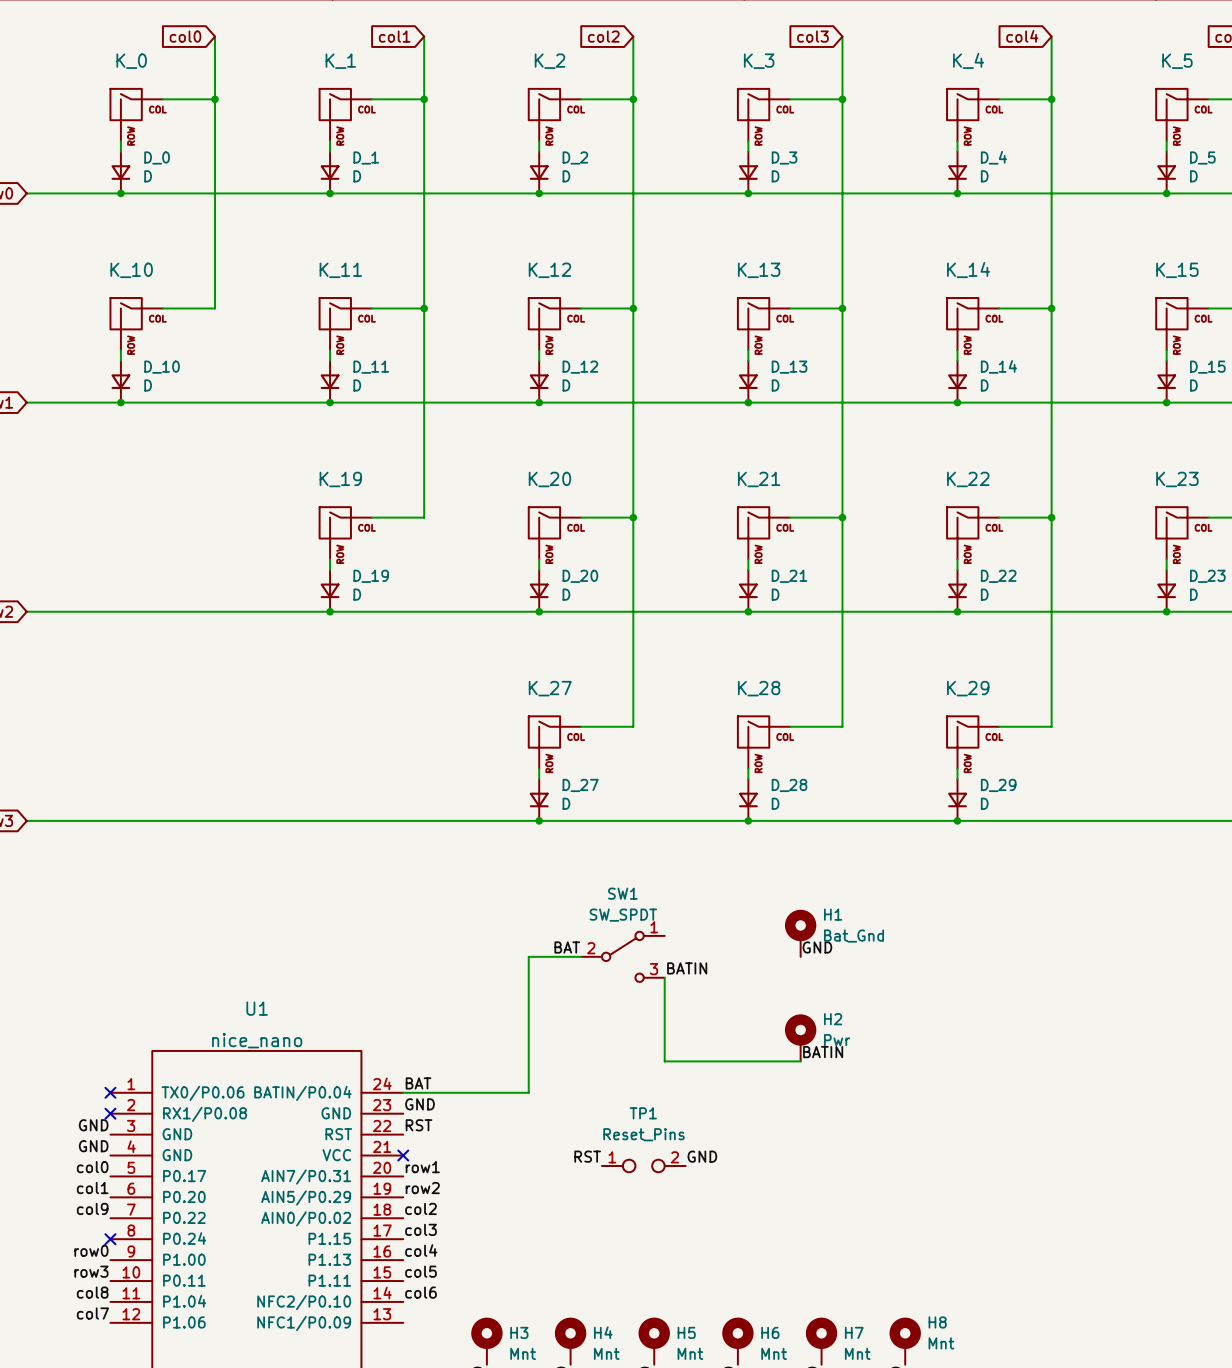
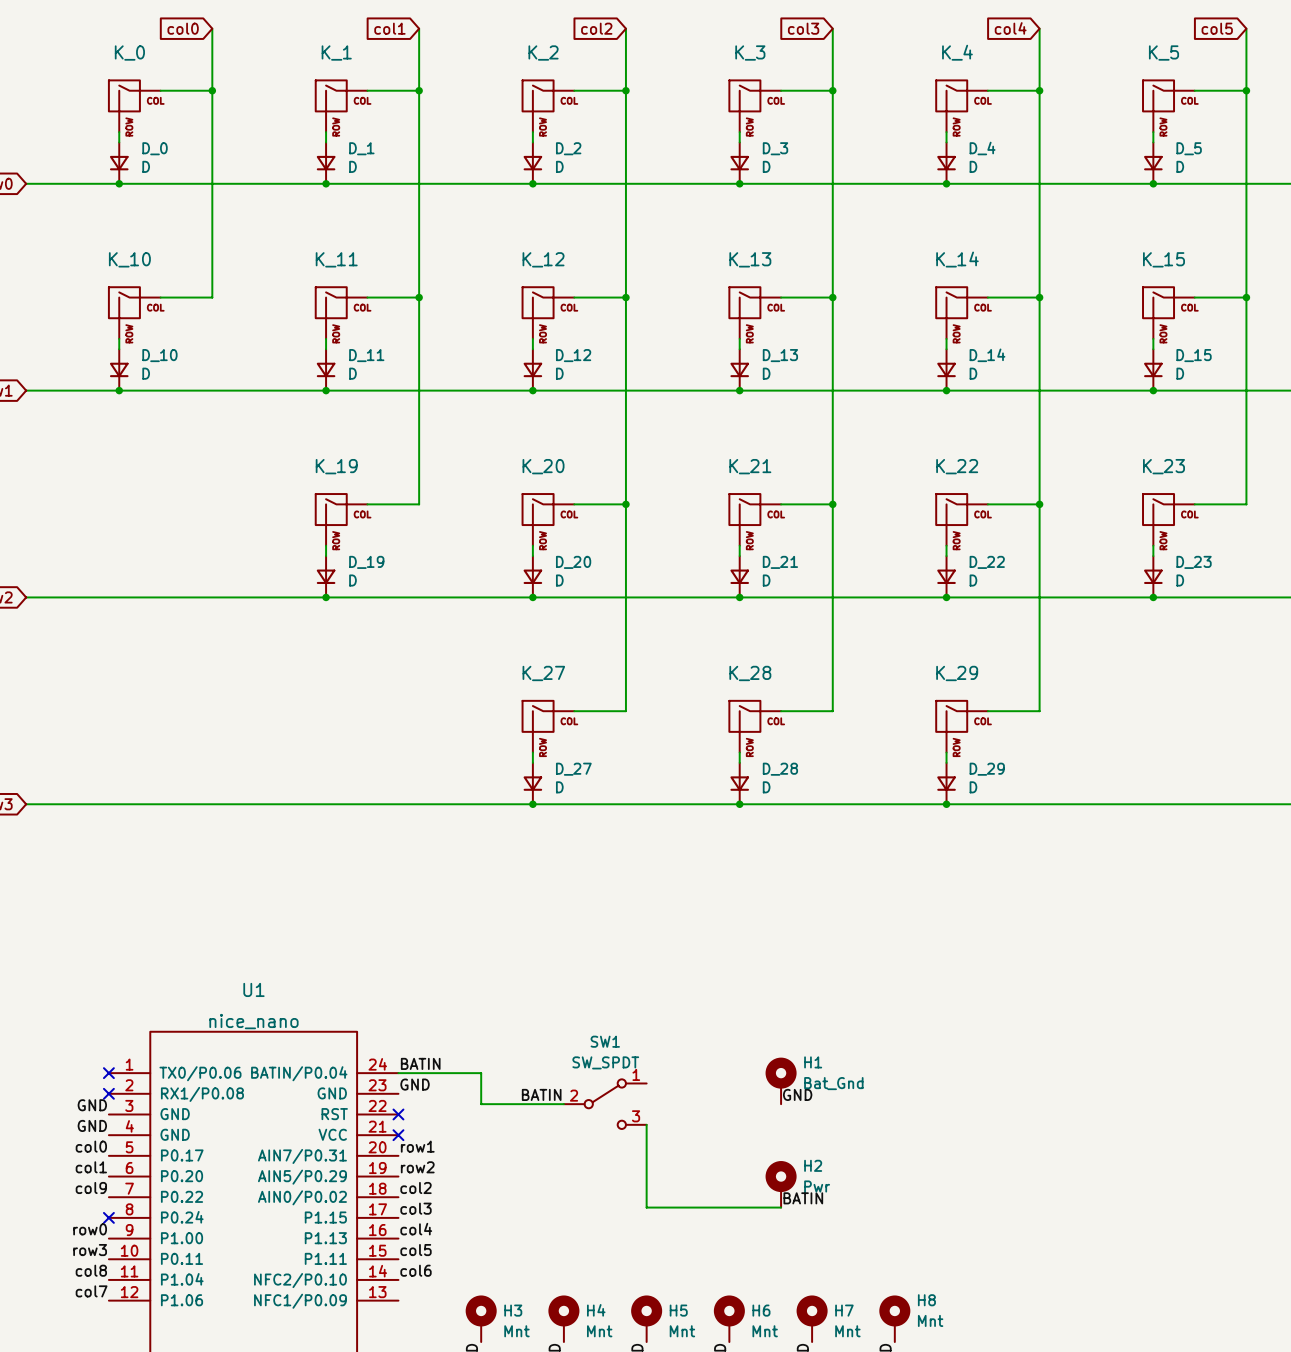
H1 position: (800, 933) -> (781, 1080)
label: BAT (567, 947) -> none
label: GND (817, 947) -> none
wire: (581, 956) (528, 956) (528, 1092) (486, 1092) -> (563, 1104) (481, 1104) (481, 1073)
SW1 position: (622, 956) -> (605, 1104)
label: BATIN (687, 968) -> none
wire: (664, 977) (664, 1061) (800, 1061) -> (646, 1124) (646, 1207) (781, 1207)
H2 position: (800, 1037) -> (781, 1184)
label: BATIN (823, 1052) -> none
label: BAT (418, 1083) -> BATIN (420, 1063)
label: none -> BATIN (541, 1094)
label: none -> GND (797, 1094)
label: RST (419, 1125) -> none
no-connect mark: none -> (398, 1114)
label: RST (587, 1156) -> none
label: GND (702, 1156) -> none
TP1: Reset_Pins (643, 1165) -> none
label: none -> BATIN (803, 1198)

